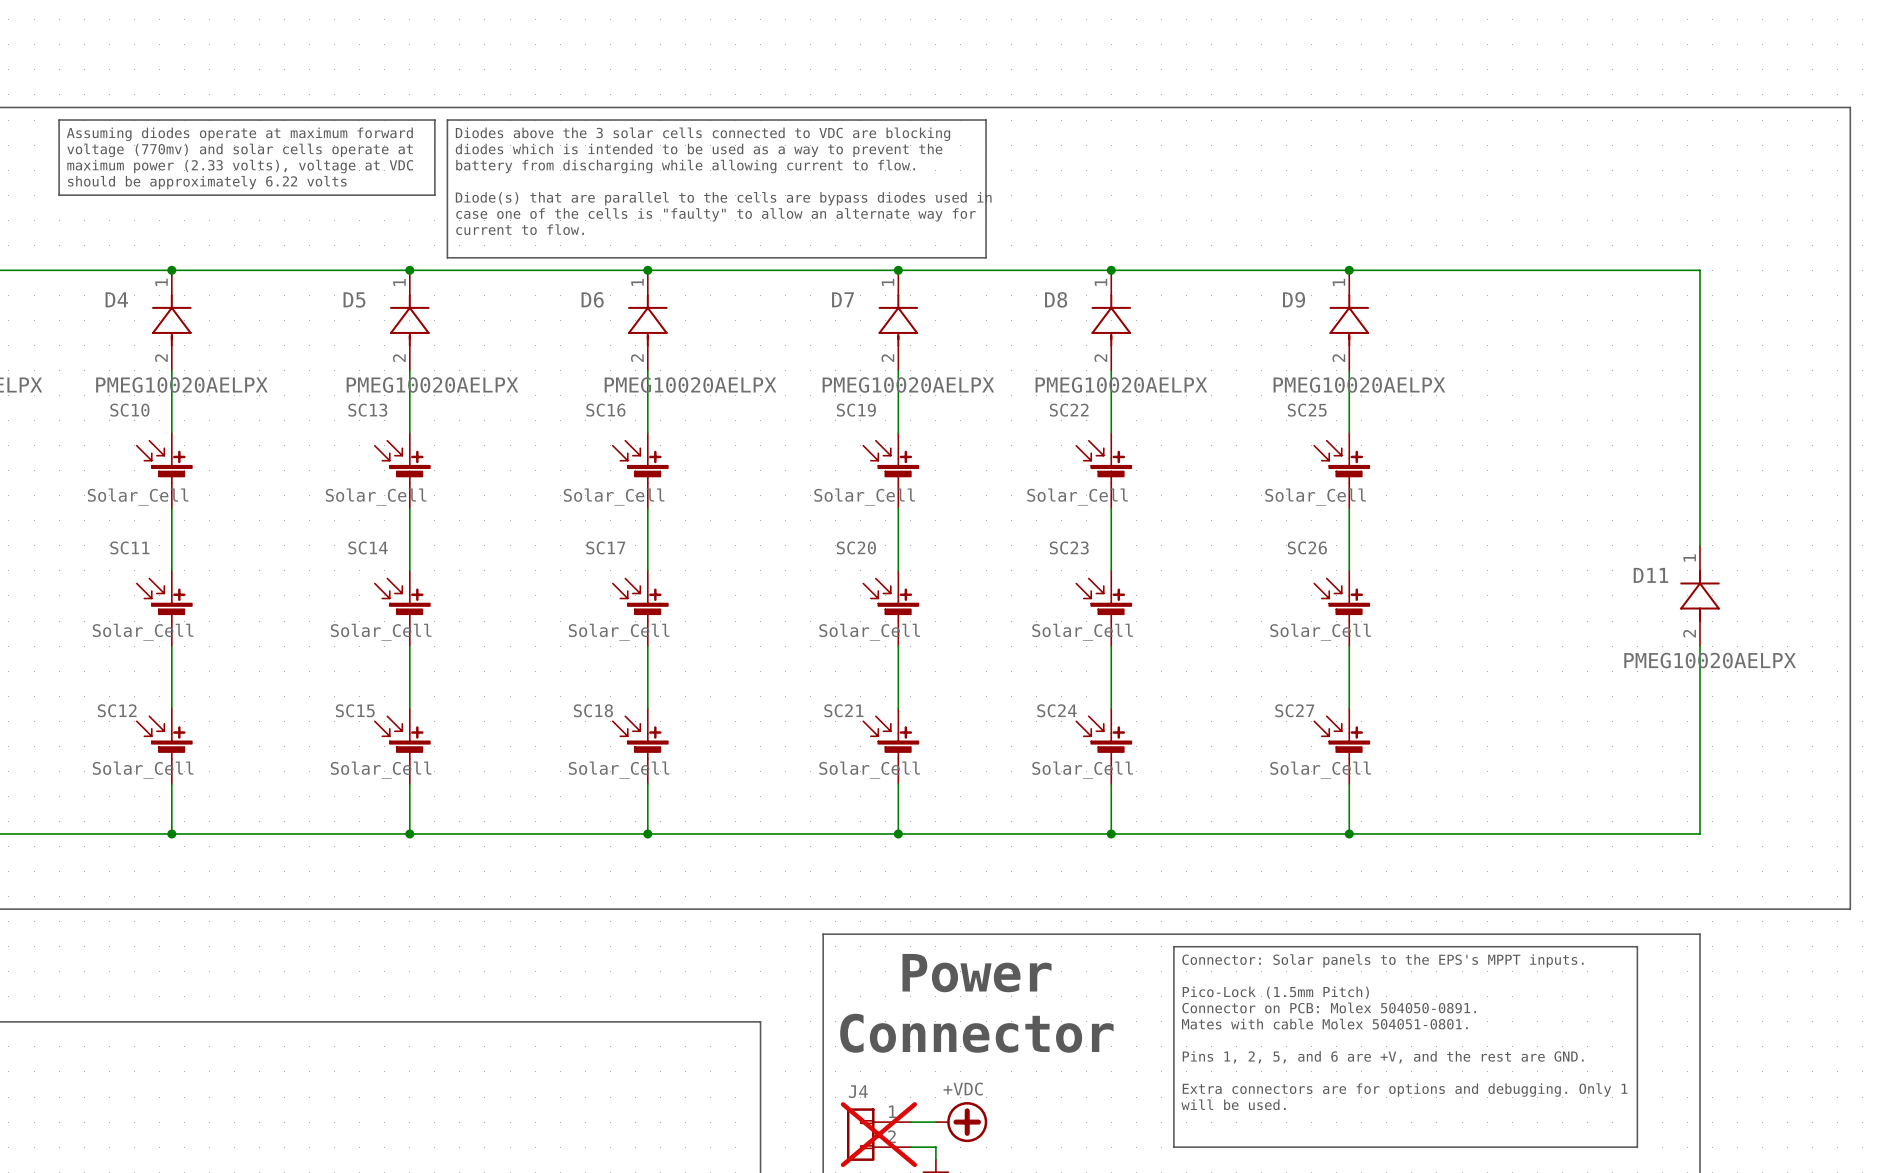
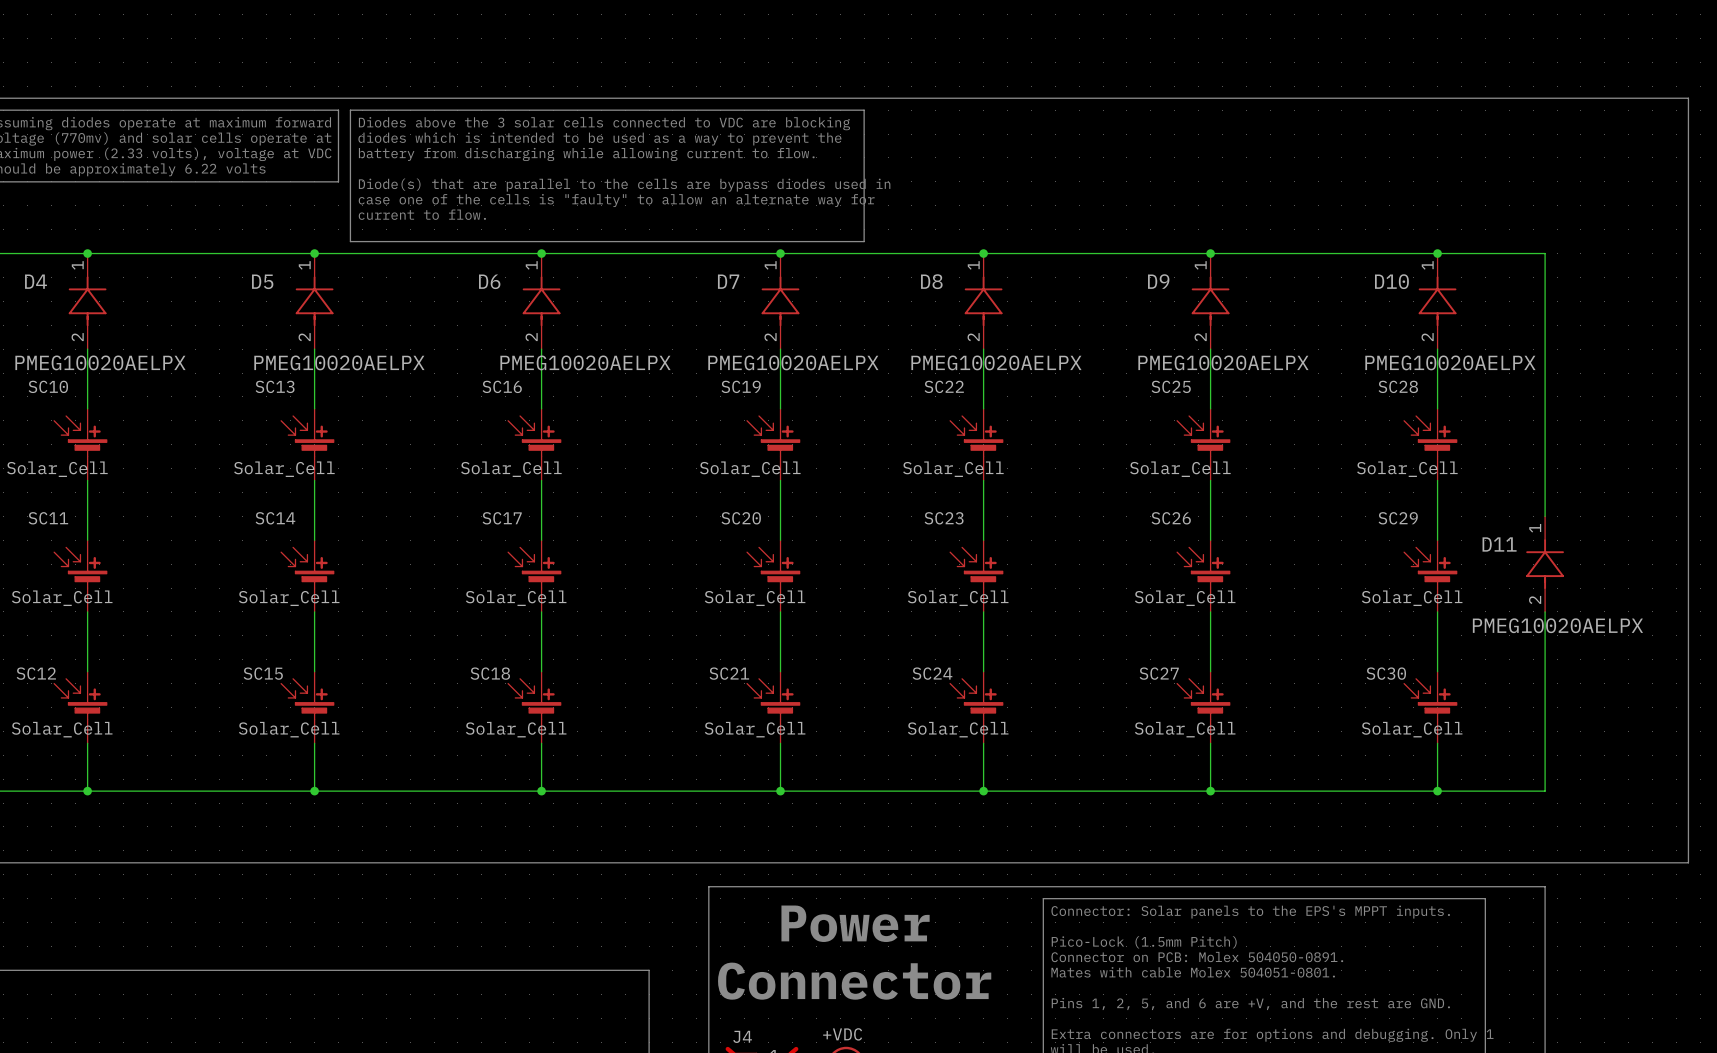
junction: none -> (1437, 253)
D10: none -> PMEG10020AELPX (1437, 301)
wire: none -> (1437, 349) (1437, 408)
SC28: none -> Solar_Cell (1430, 444)
wire: none -> (1437, 480) (1437, 540)
SC29: none -> Solar_Cell (1430, 576)
wire: none -> (1437, 611) (1437, 671)
SC30: none -> Solar_Cell (1430, 707)
wire: none -> (1437, 743) (1437, 791)
junction: none -> (1437, 791)

